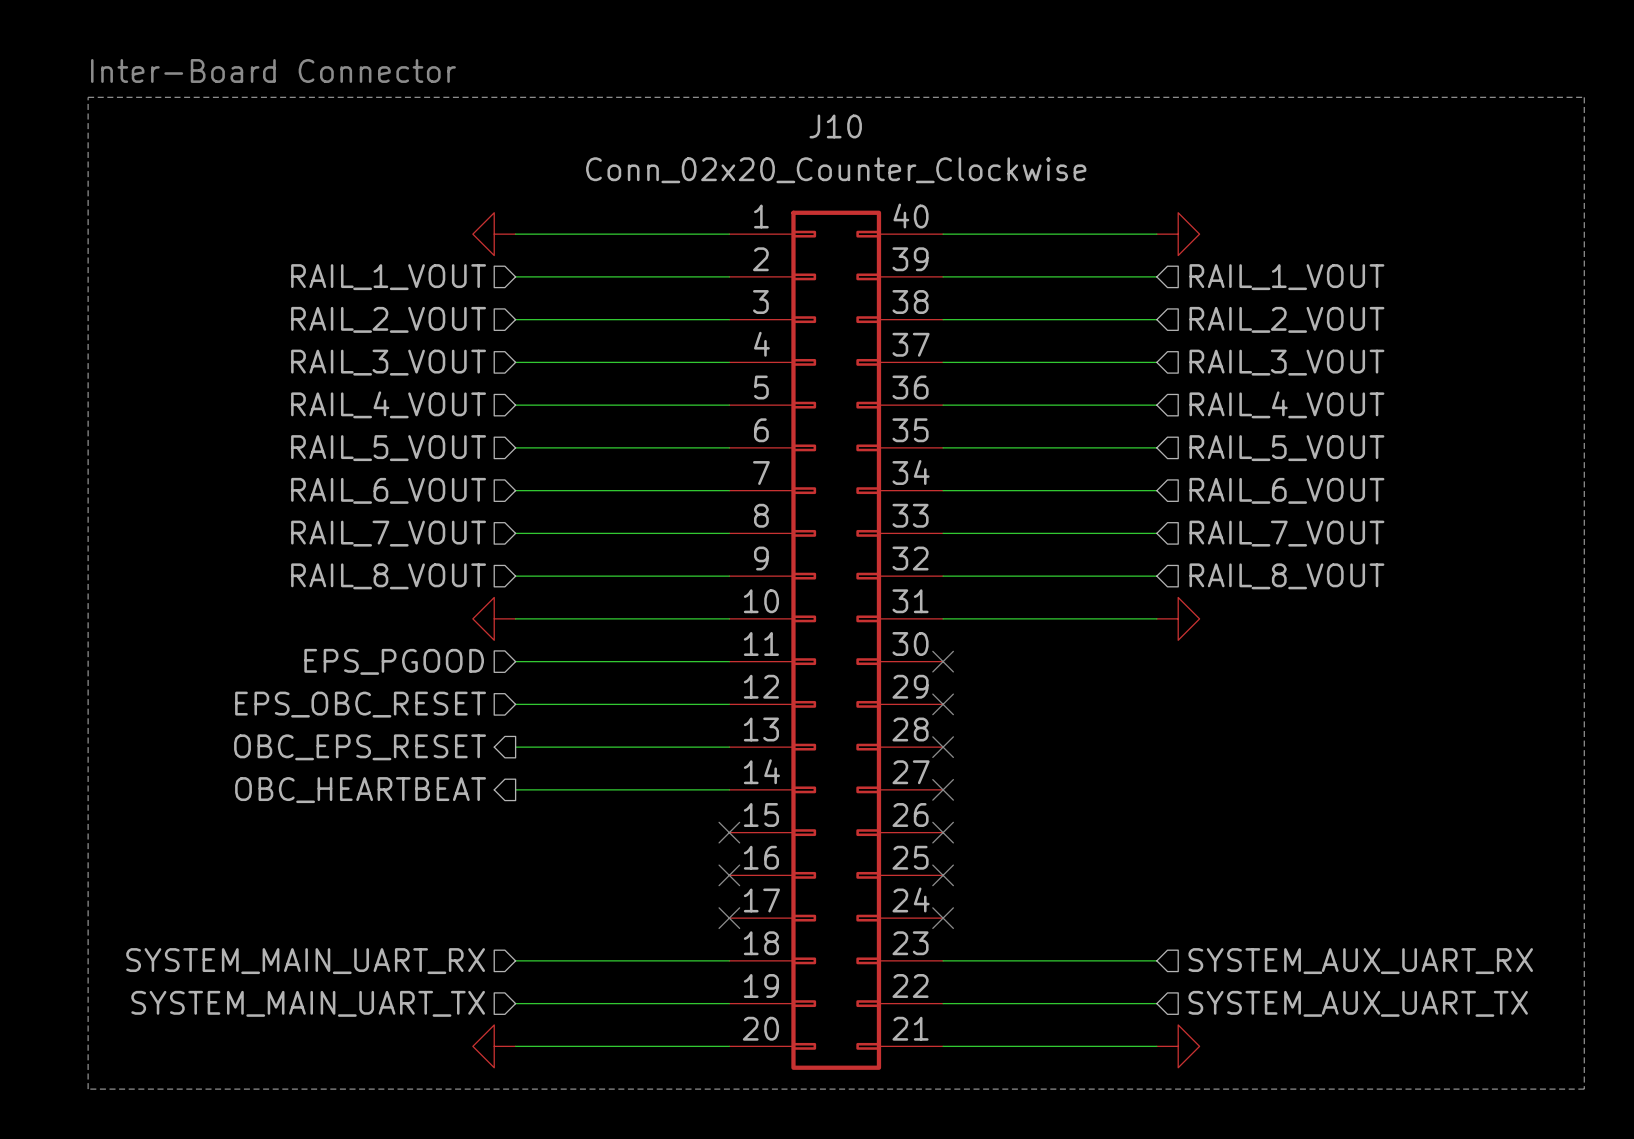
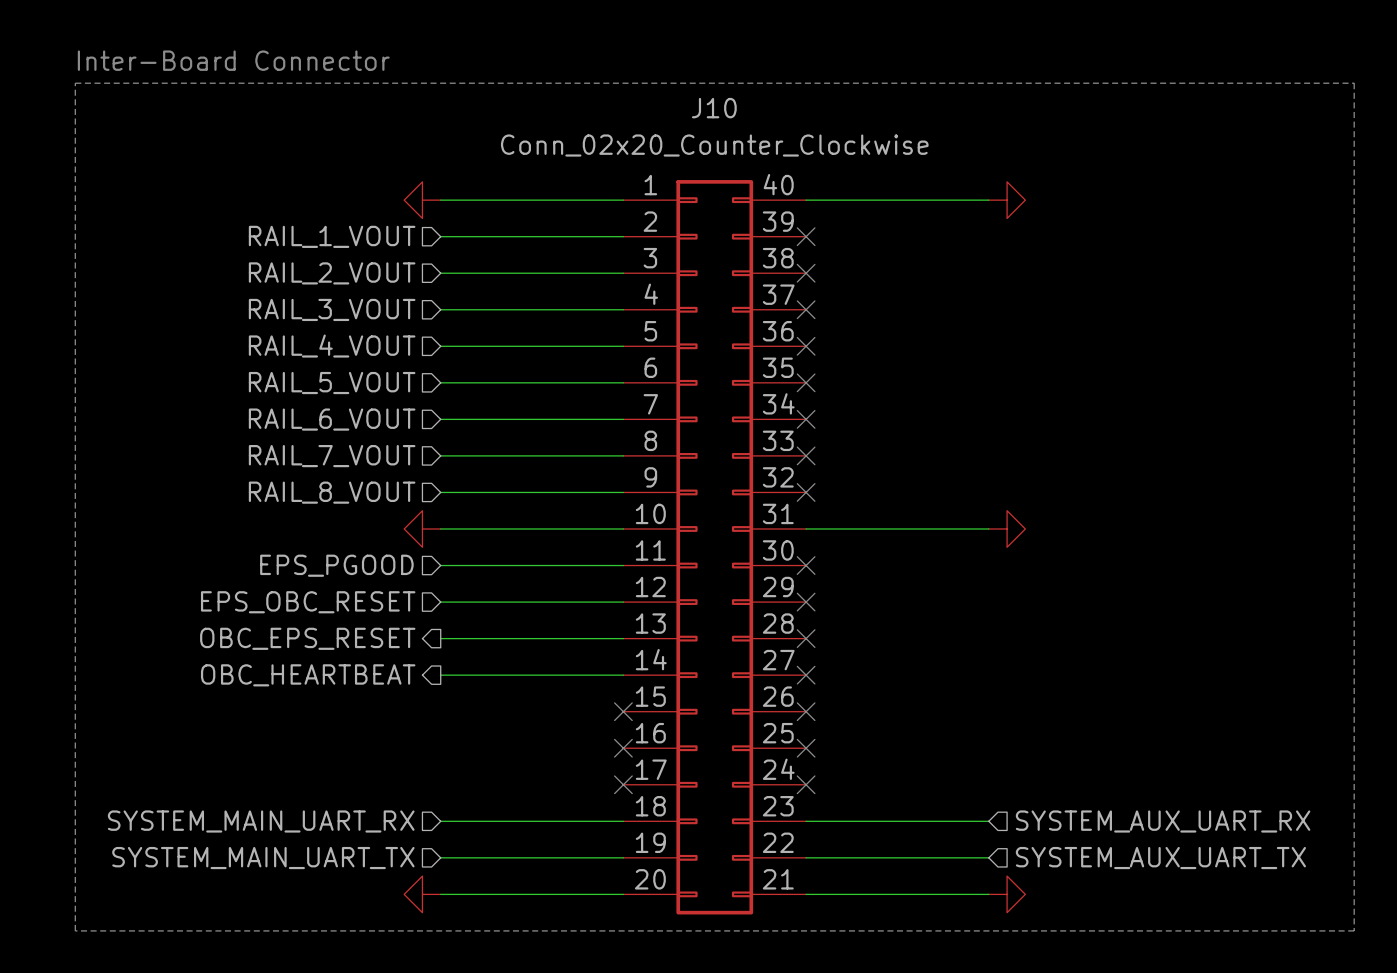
wire: (943, 276) (1156, 276) -> none
no-connect mark: none -> (806, 236)
hierarchical label: RAIL_1_VOUT (1286, 277) -> none
wire: (943, 319) (1156, 319) -> none
no-connect mark: none -> (806, 273)
hierarchical label: RAIL_2_VOUT (1286, 319) -> none
wire: (943, 362) (1156, 362) -> none
no-connect mark: none -> (806, 309)
hierarchical label: RAIL_3_VOUT (1286, 362) -> none
hierarchical label: RAIL_4_VOUT (1286, 404) -> none
wire: (943, 405) (1156, 405) -> none
no-connect mark: none -> (806, 346)
wire: (943, 447) (1156, 447) -> none
no-connect mark: none -> (806, 382)
hierarchical label: RAIL_5_VOUT (1286, 448) -> none
wire: (943, 490) (1156, 490) -> none
no-connect mark: none -> (806, 419)
hierarchical label: RAIL_6_VOUT (1286, 490) -> none
wire: (943, 533) (1156, 533) -> none
no-connect mark: none -> (806, 455)
hierarchical label: RAIL_7_VOUT (1286, 533) -> none
wire: (943, 576) (1156, 576) -> none
no-connect mark: none -> (806, 492)
hierarchical label: RAIL_8_VOUT (1286, 576) -> none

